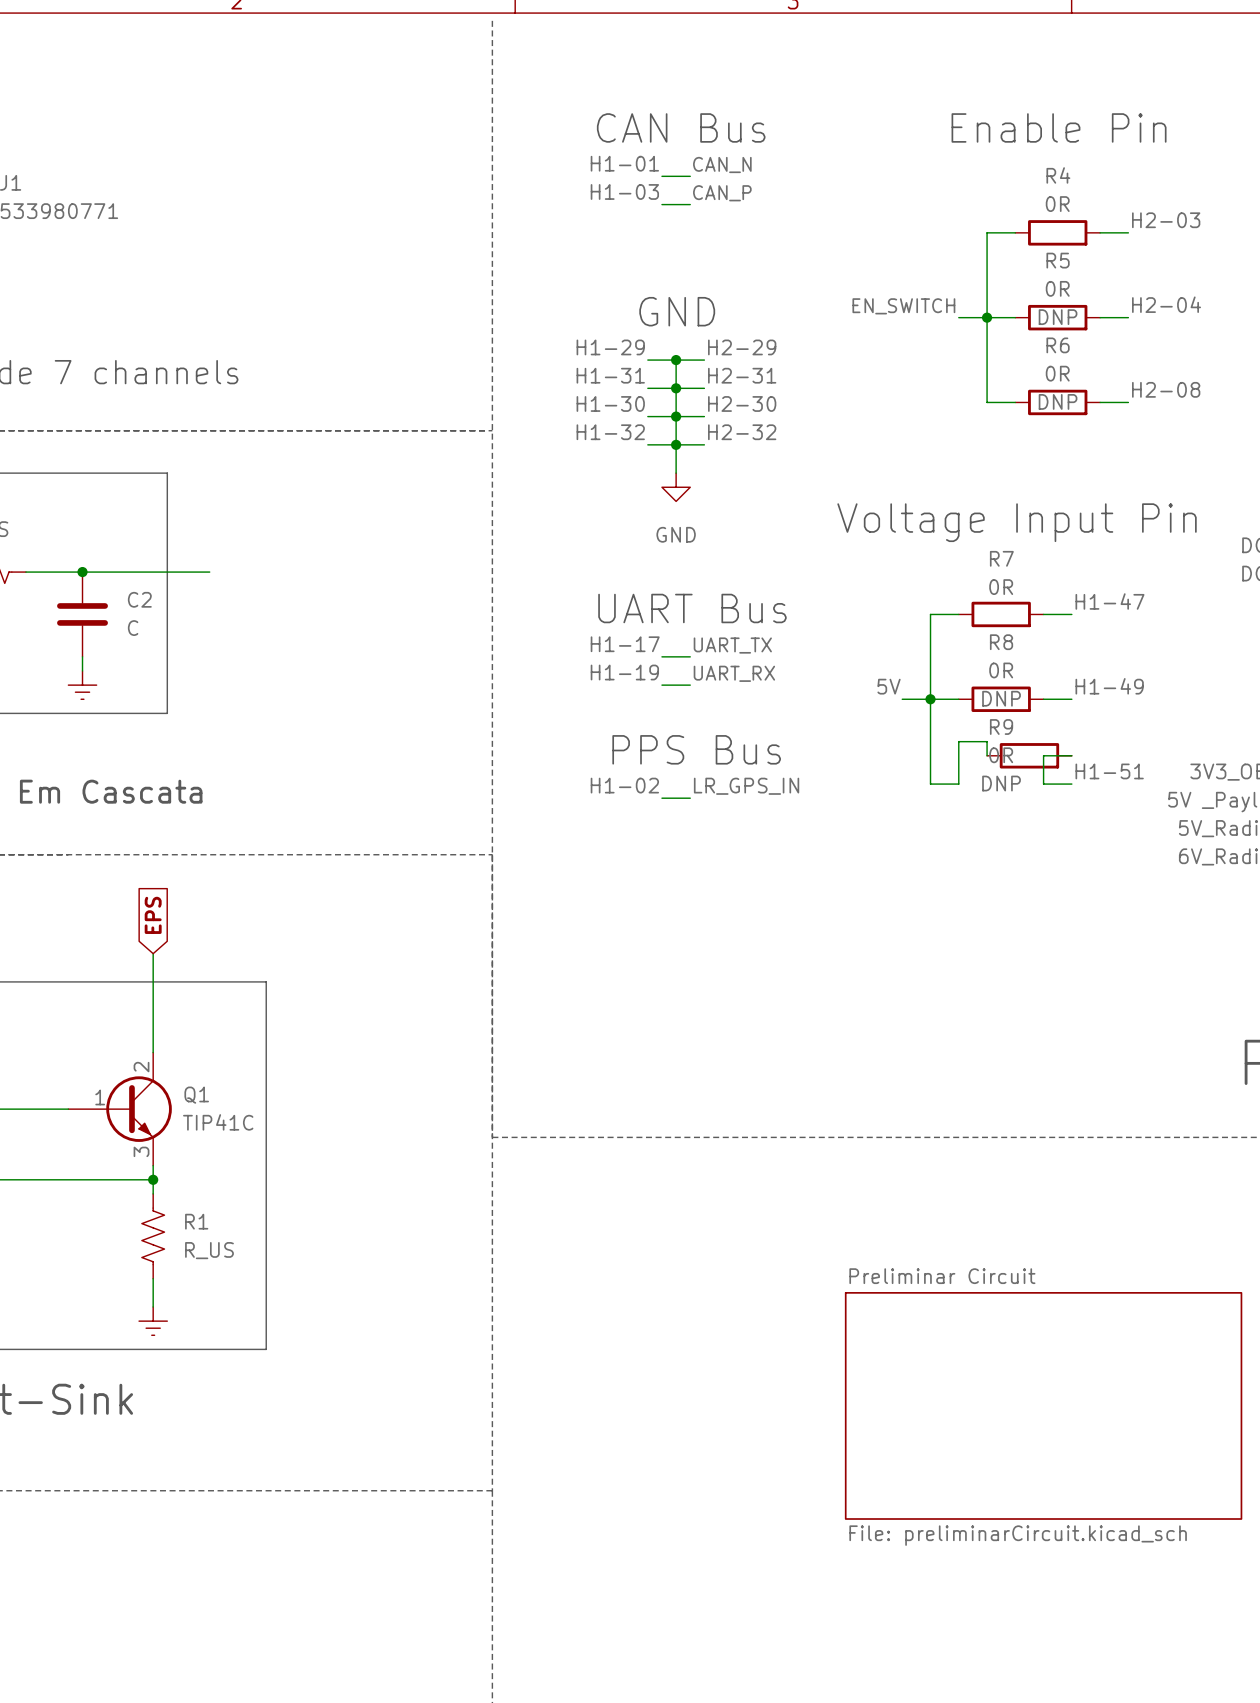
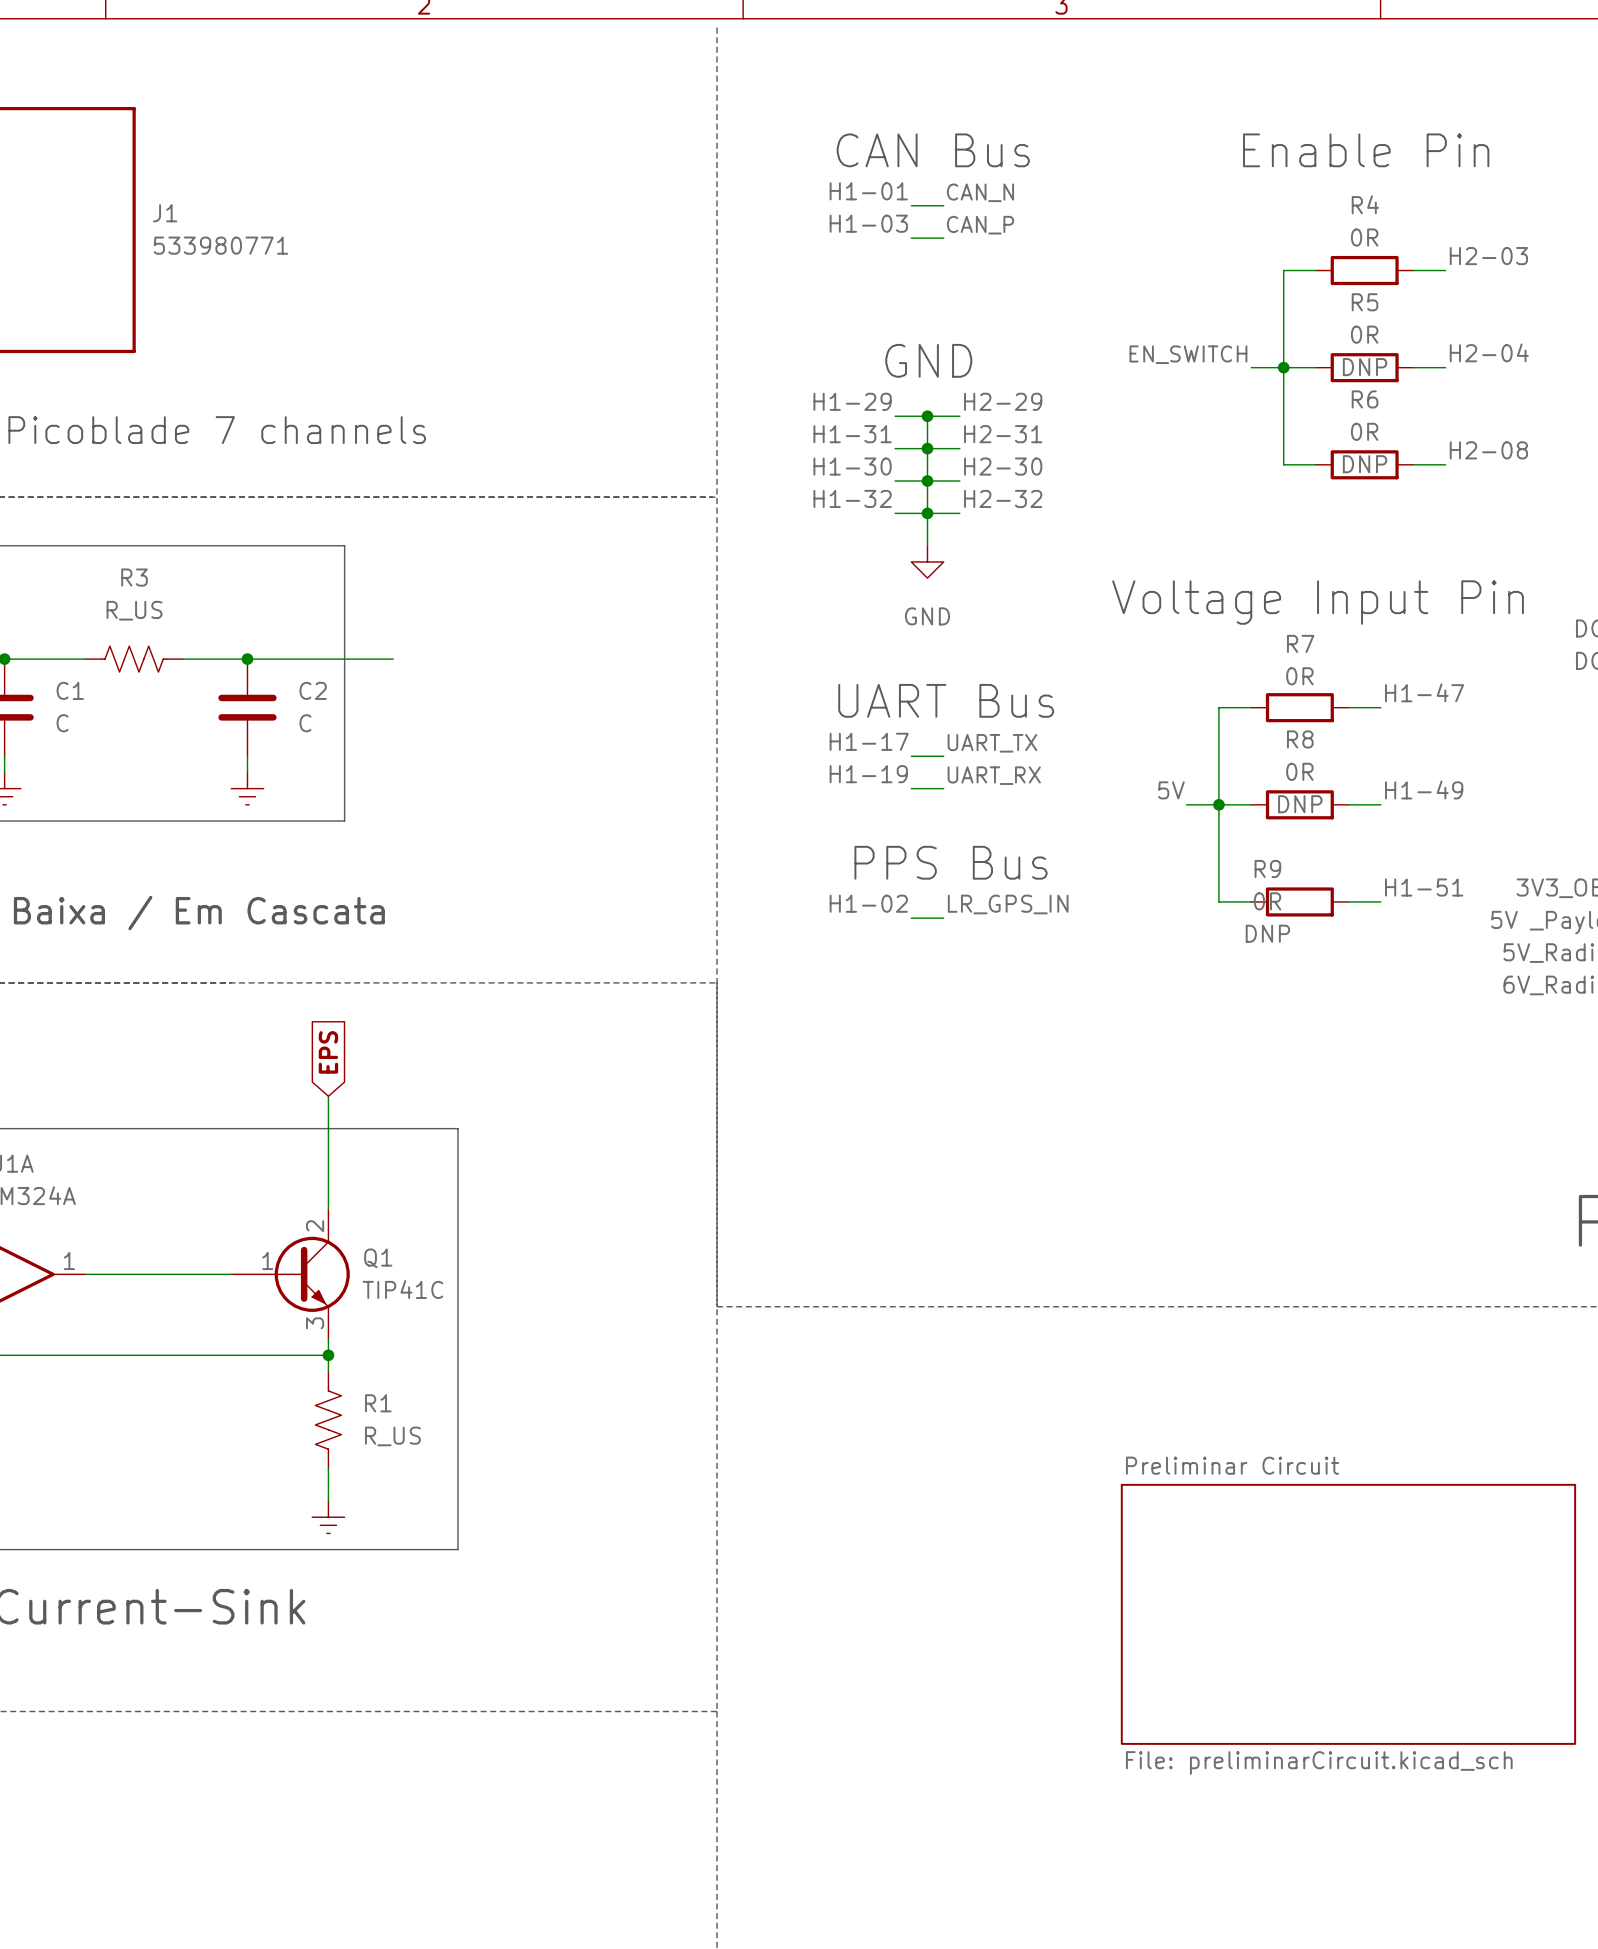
wire: (987, 755) (987, 741) (958, 741) (958, 784) -> none
R9 position: (1029, 755) -> (1299, 901)
wire: (1071, 755) (1043, 755) (1043, 784) -> none

